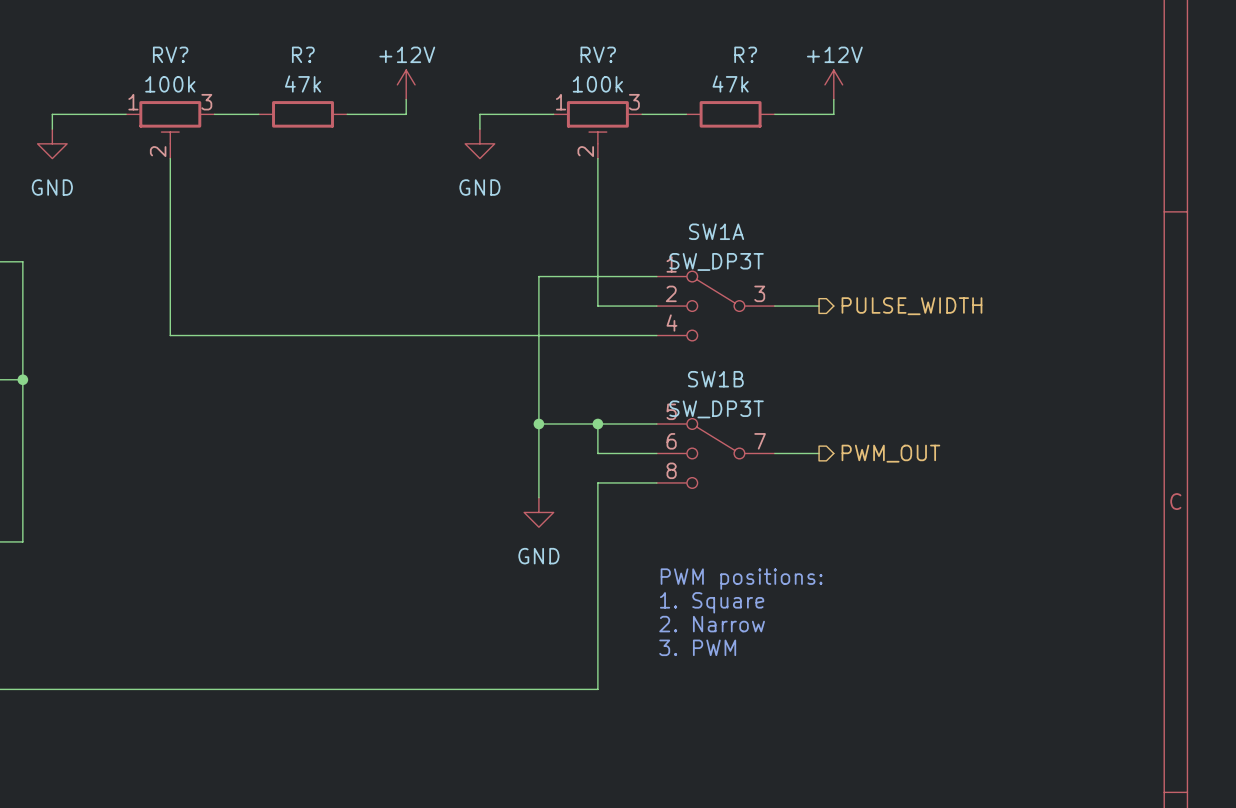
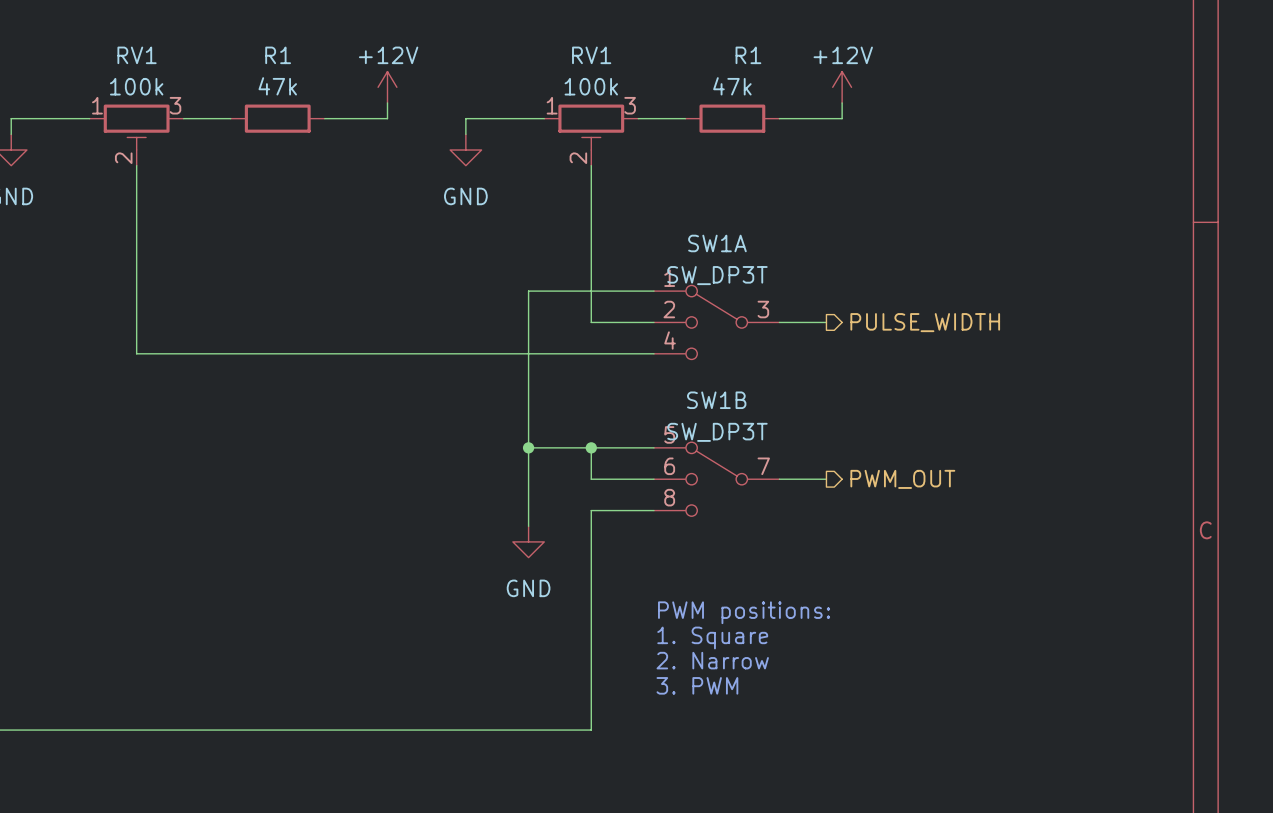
RV? name: RV? (170, 54) -> RV1 (137, 55)
R? name: R? (303, 54) -> R1 (278, 55)
RV? name: RV? (598, 54) -> RV1 (591, 55)
R? name: R? (745, 54) -> R1 (748, 55)

